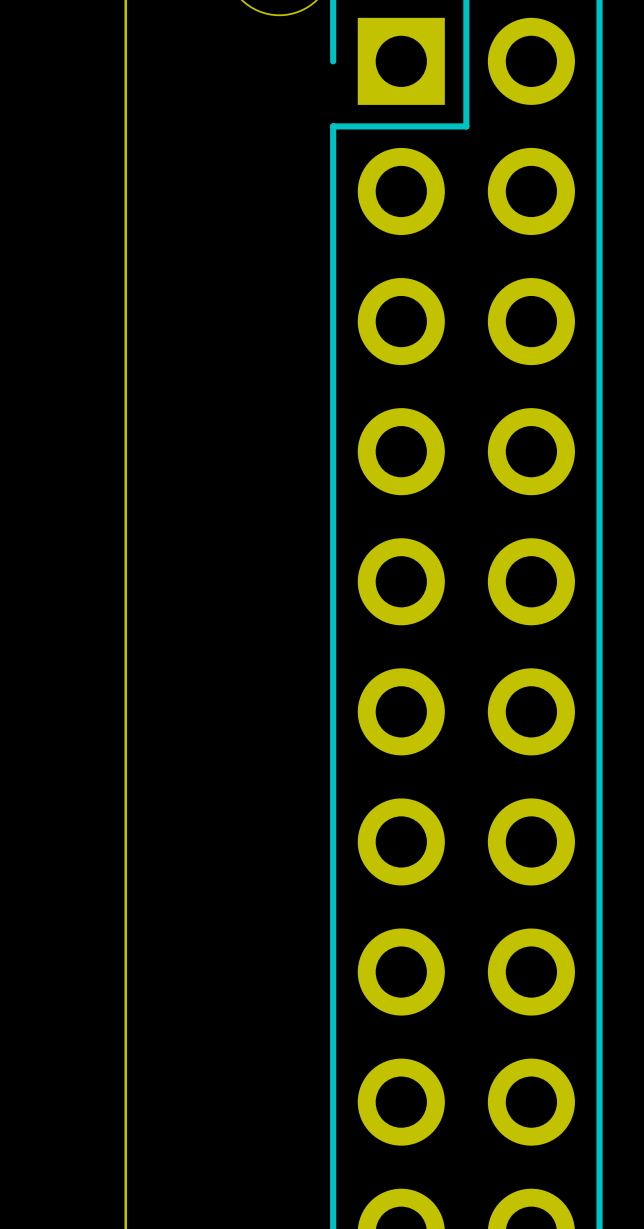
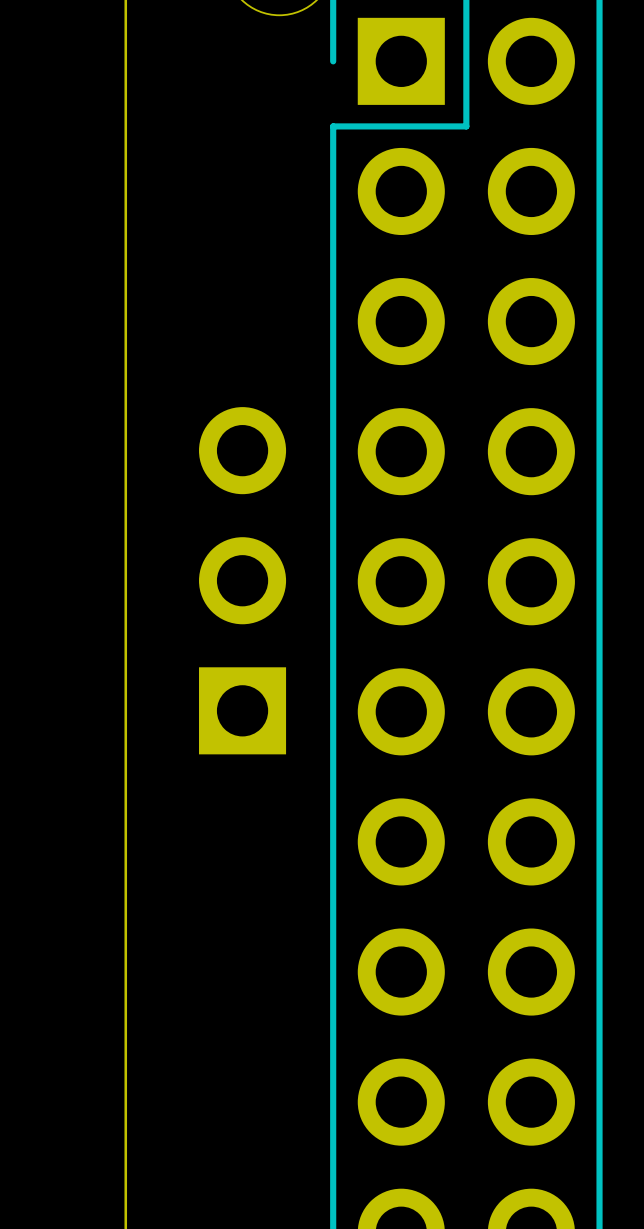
part: none -> (242, 580)

